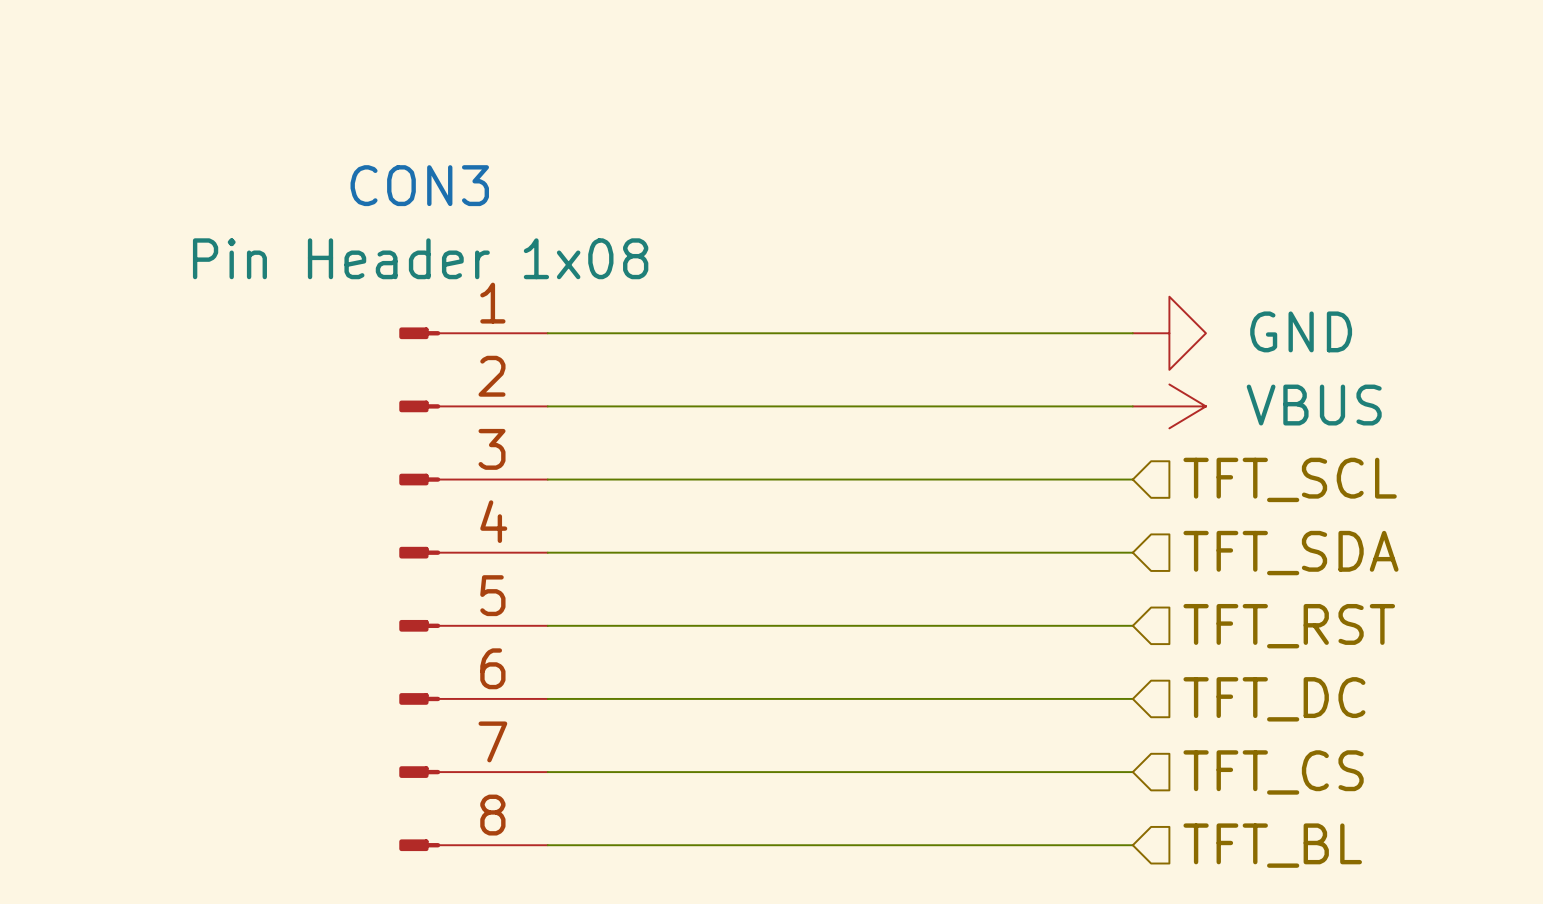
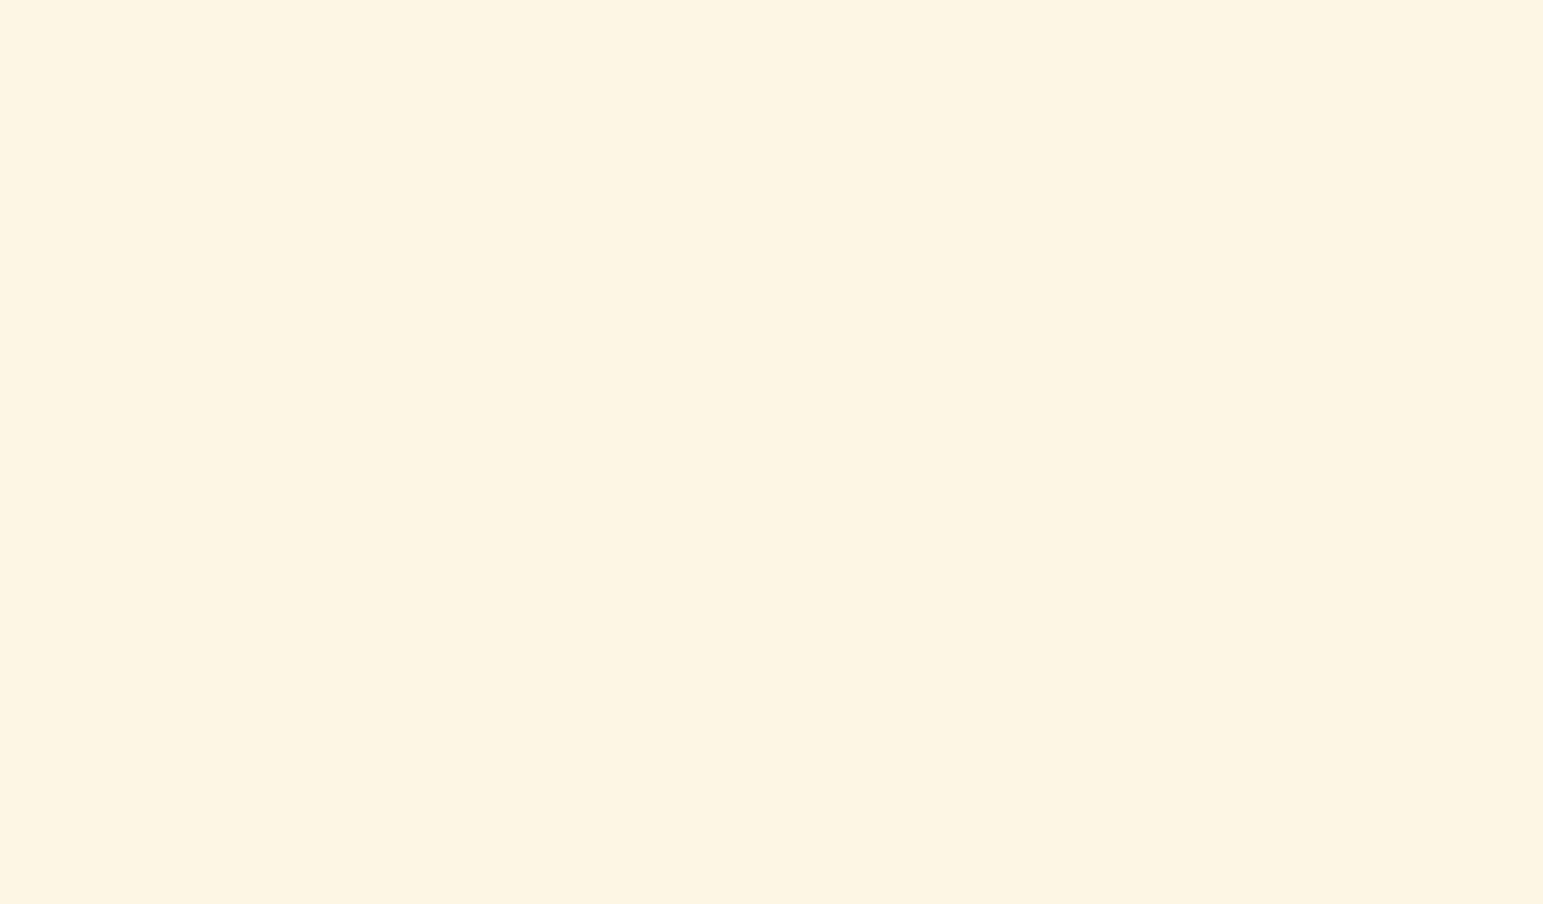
wire: (547, 333) (1132, 333) -> none
power symbol: GND (1169, 333) -> none
wire: (547, 406) (1132, 406) -> none
power symbol: VBUS (1169, 406) -> none
wire: (547, 479) (1132, 479) -> none
hierarchical label: TFT_SCL (1290, 479) -> none
wire: (547, 552) (1132, 552) -> none
hierarchical label: TFT_SDA (1290, 553) -> none
CON3: Pin Header 1x08 (473, 589) -> none
wire: (547, 625) (1132, 625) -> none
hierarchical label: TFT_RST (1289, 626) -> none
wire: (547, 698) (1132, 698) -> none
hierarchical label: TFT_DC (1274, 699) -> none
wire: (547, 772) (1132, 772) -> none
hierarchical label: TFT_CS (1273, 772) -> none
wire: (547, 845) (1132, 845) -> none
hierarchical label: TFT_BL (1272, 845) -> none

